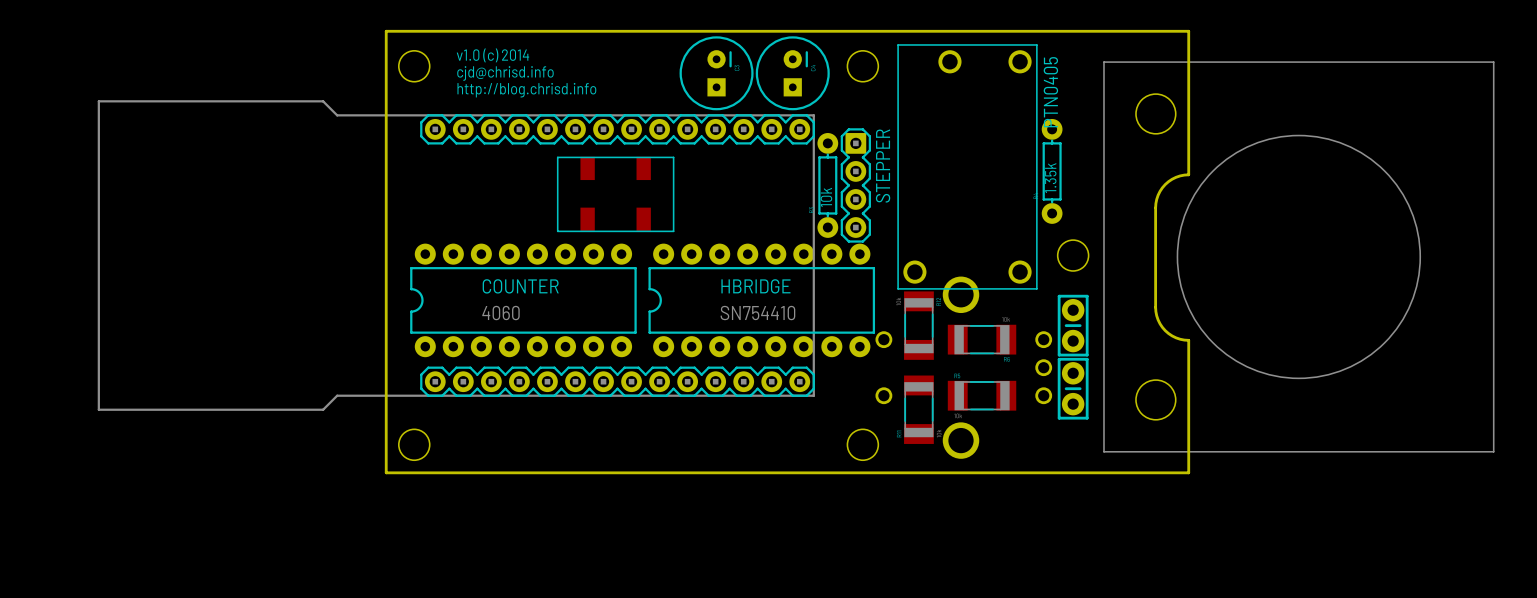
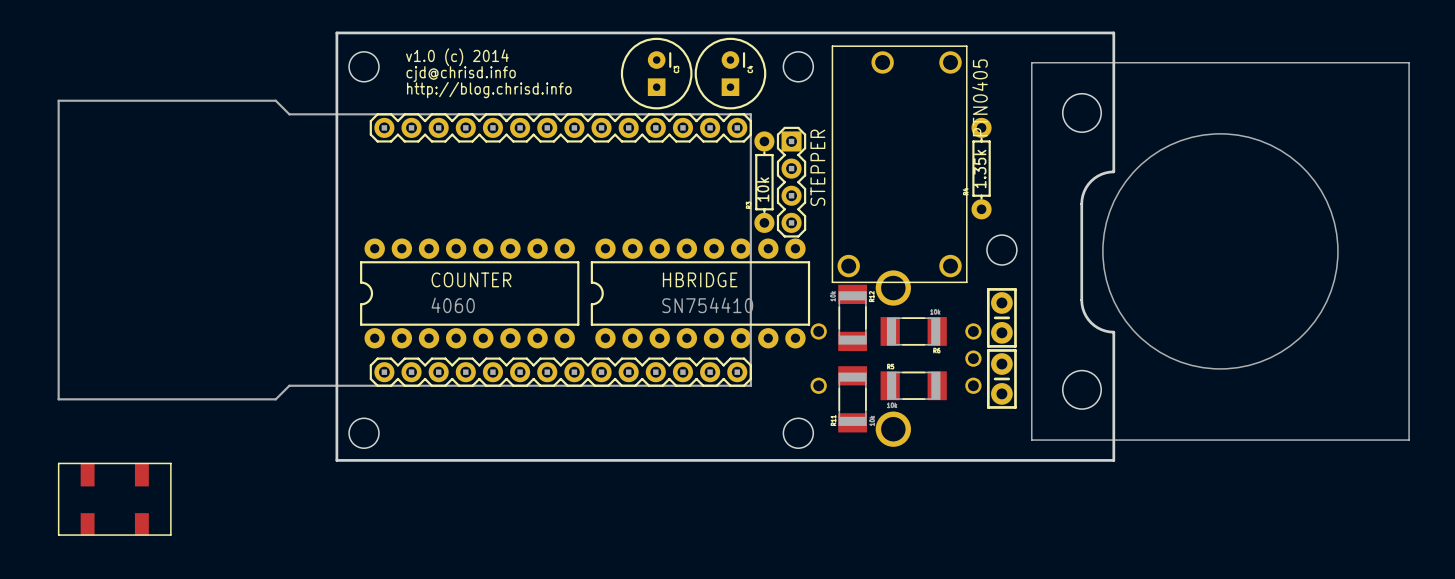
part: (615, 194) -> none
part: none -> (114, 499)

